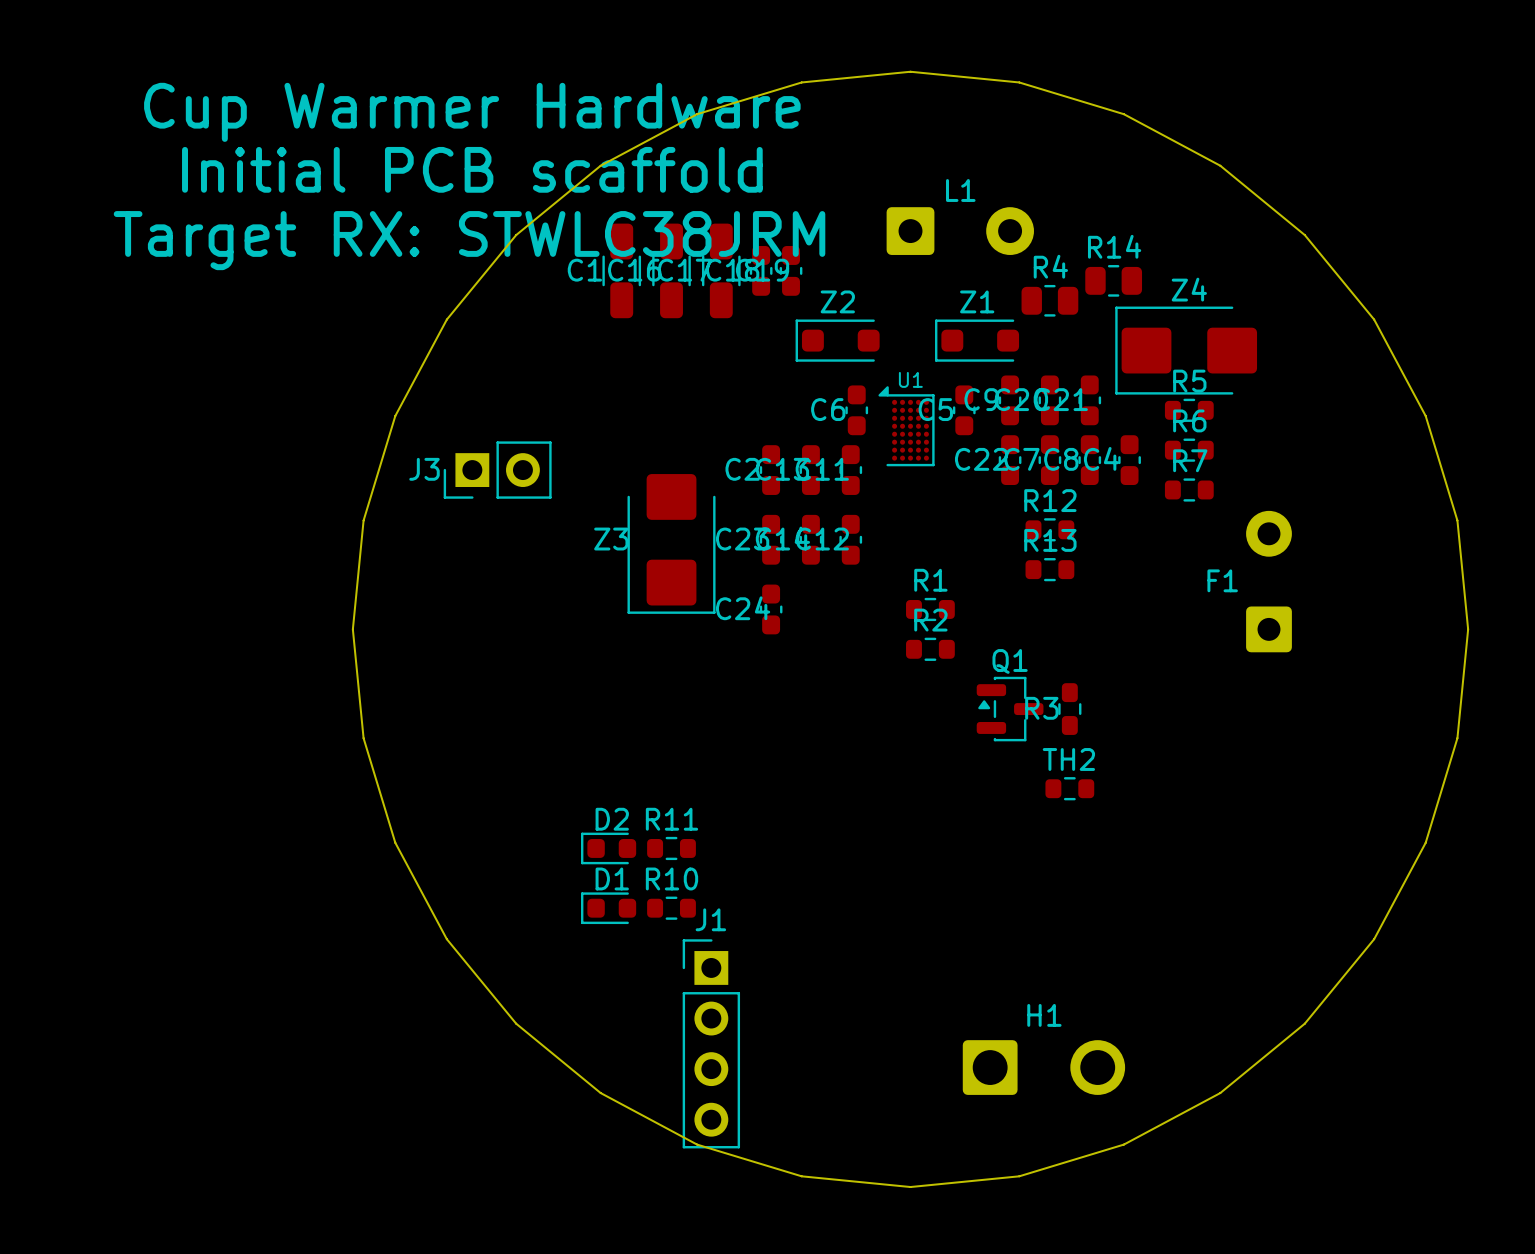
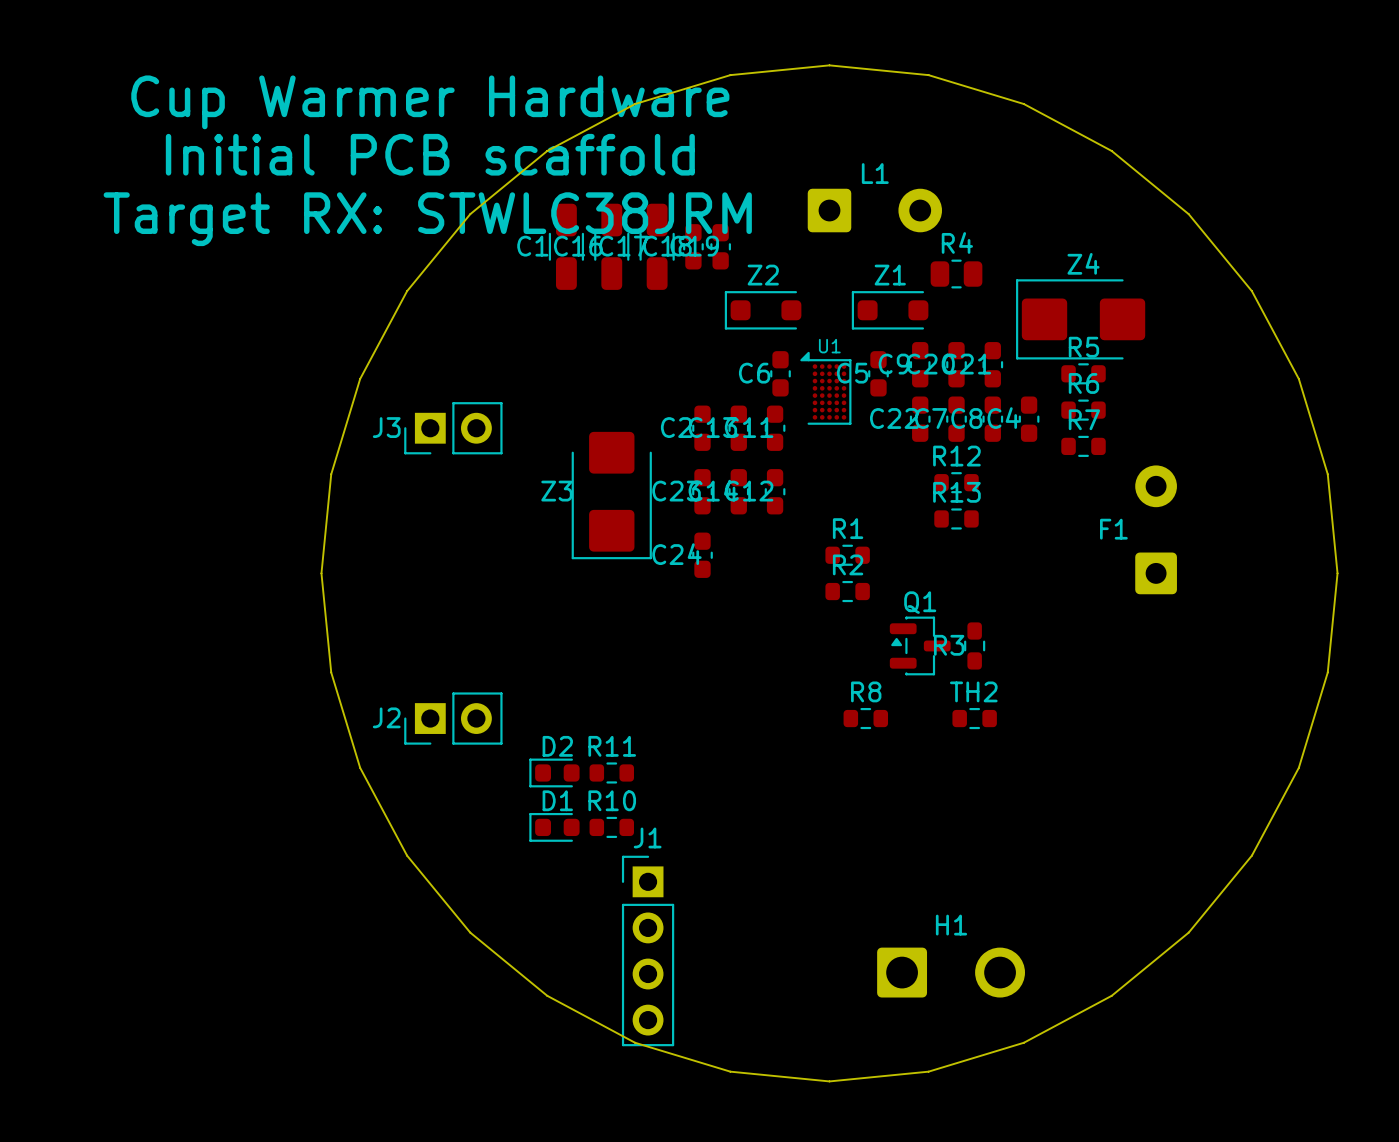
R14: (1113, 280) -> none
J2: none -> (453, 718)
R8: none -> (865, 718)

